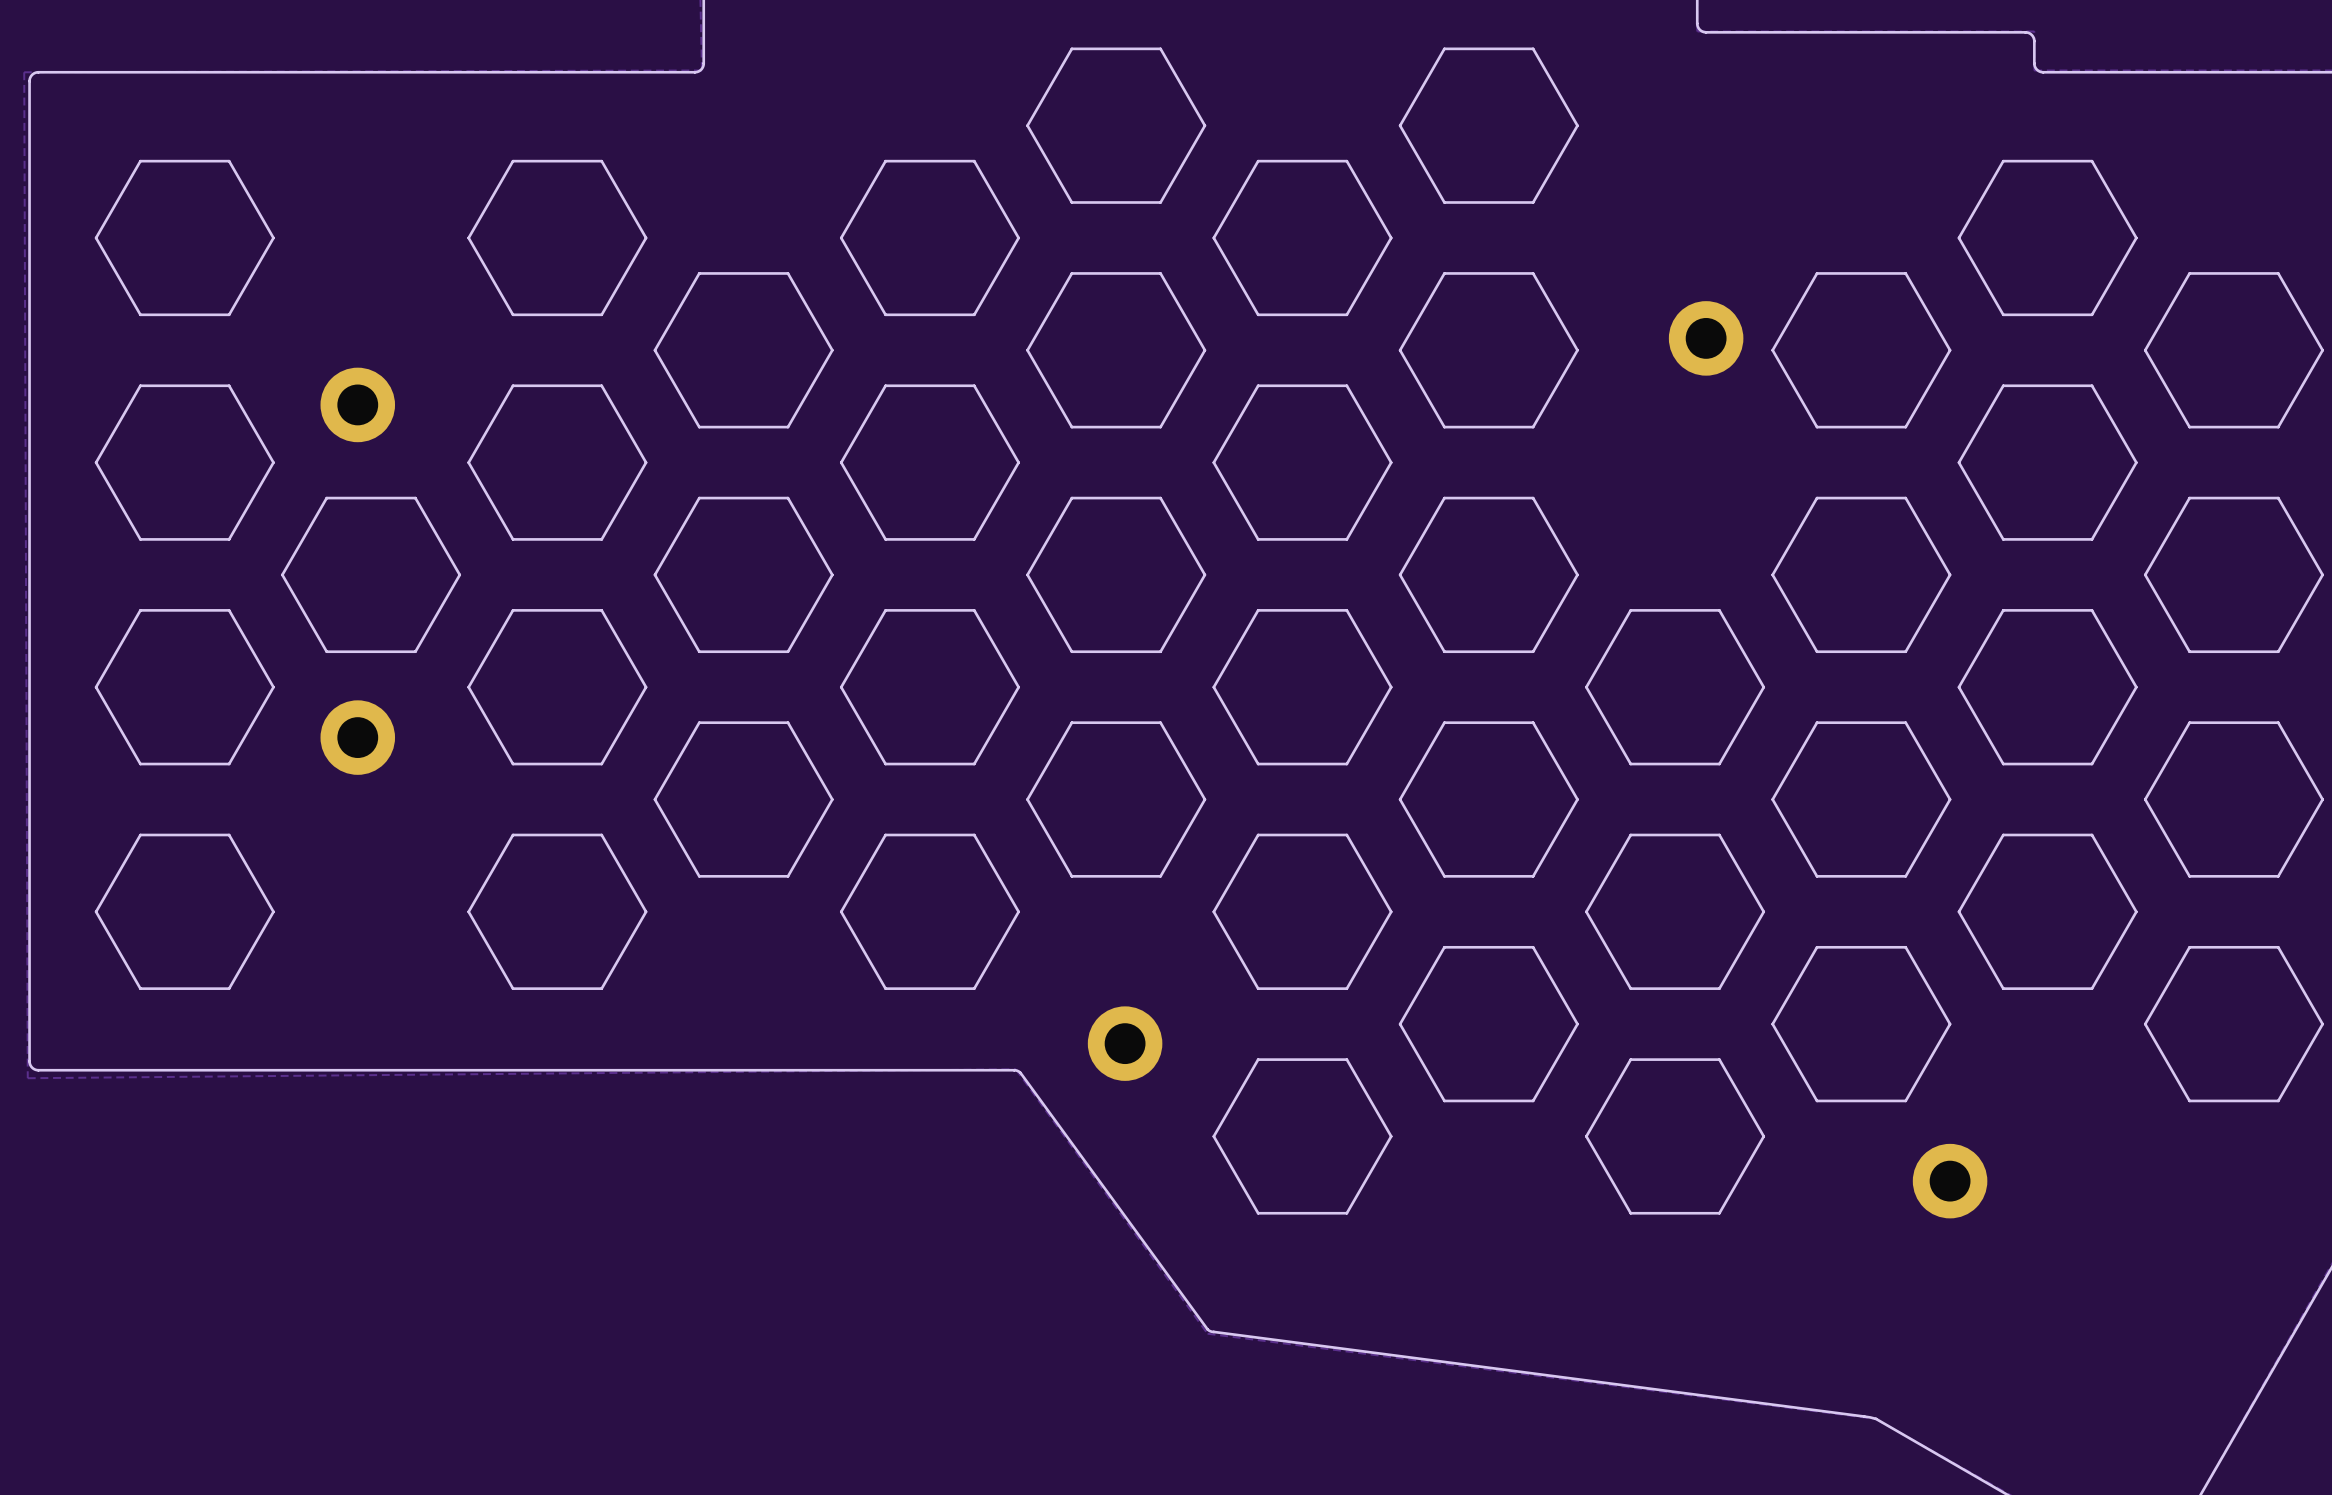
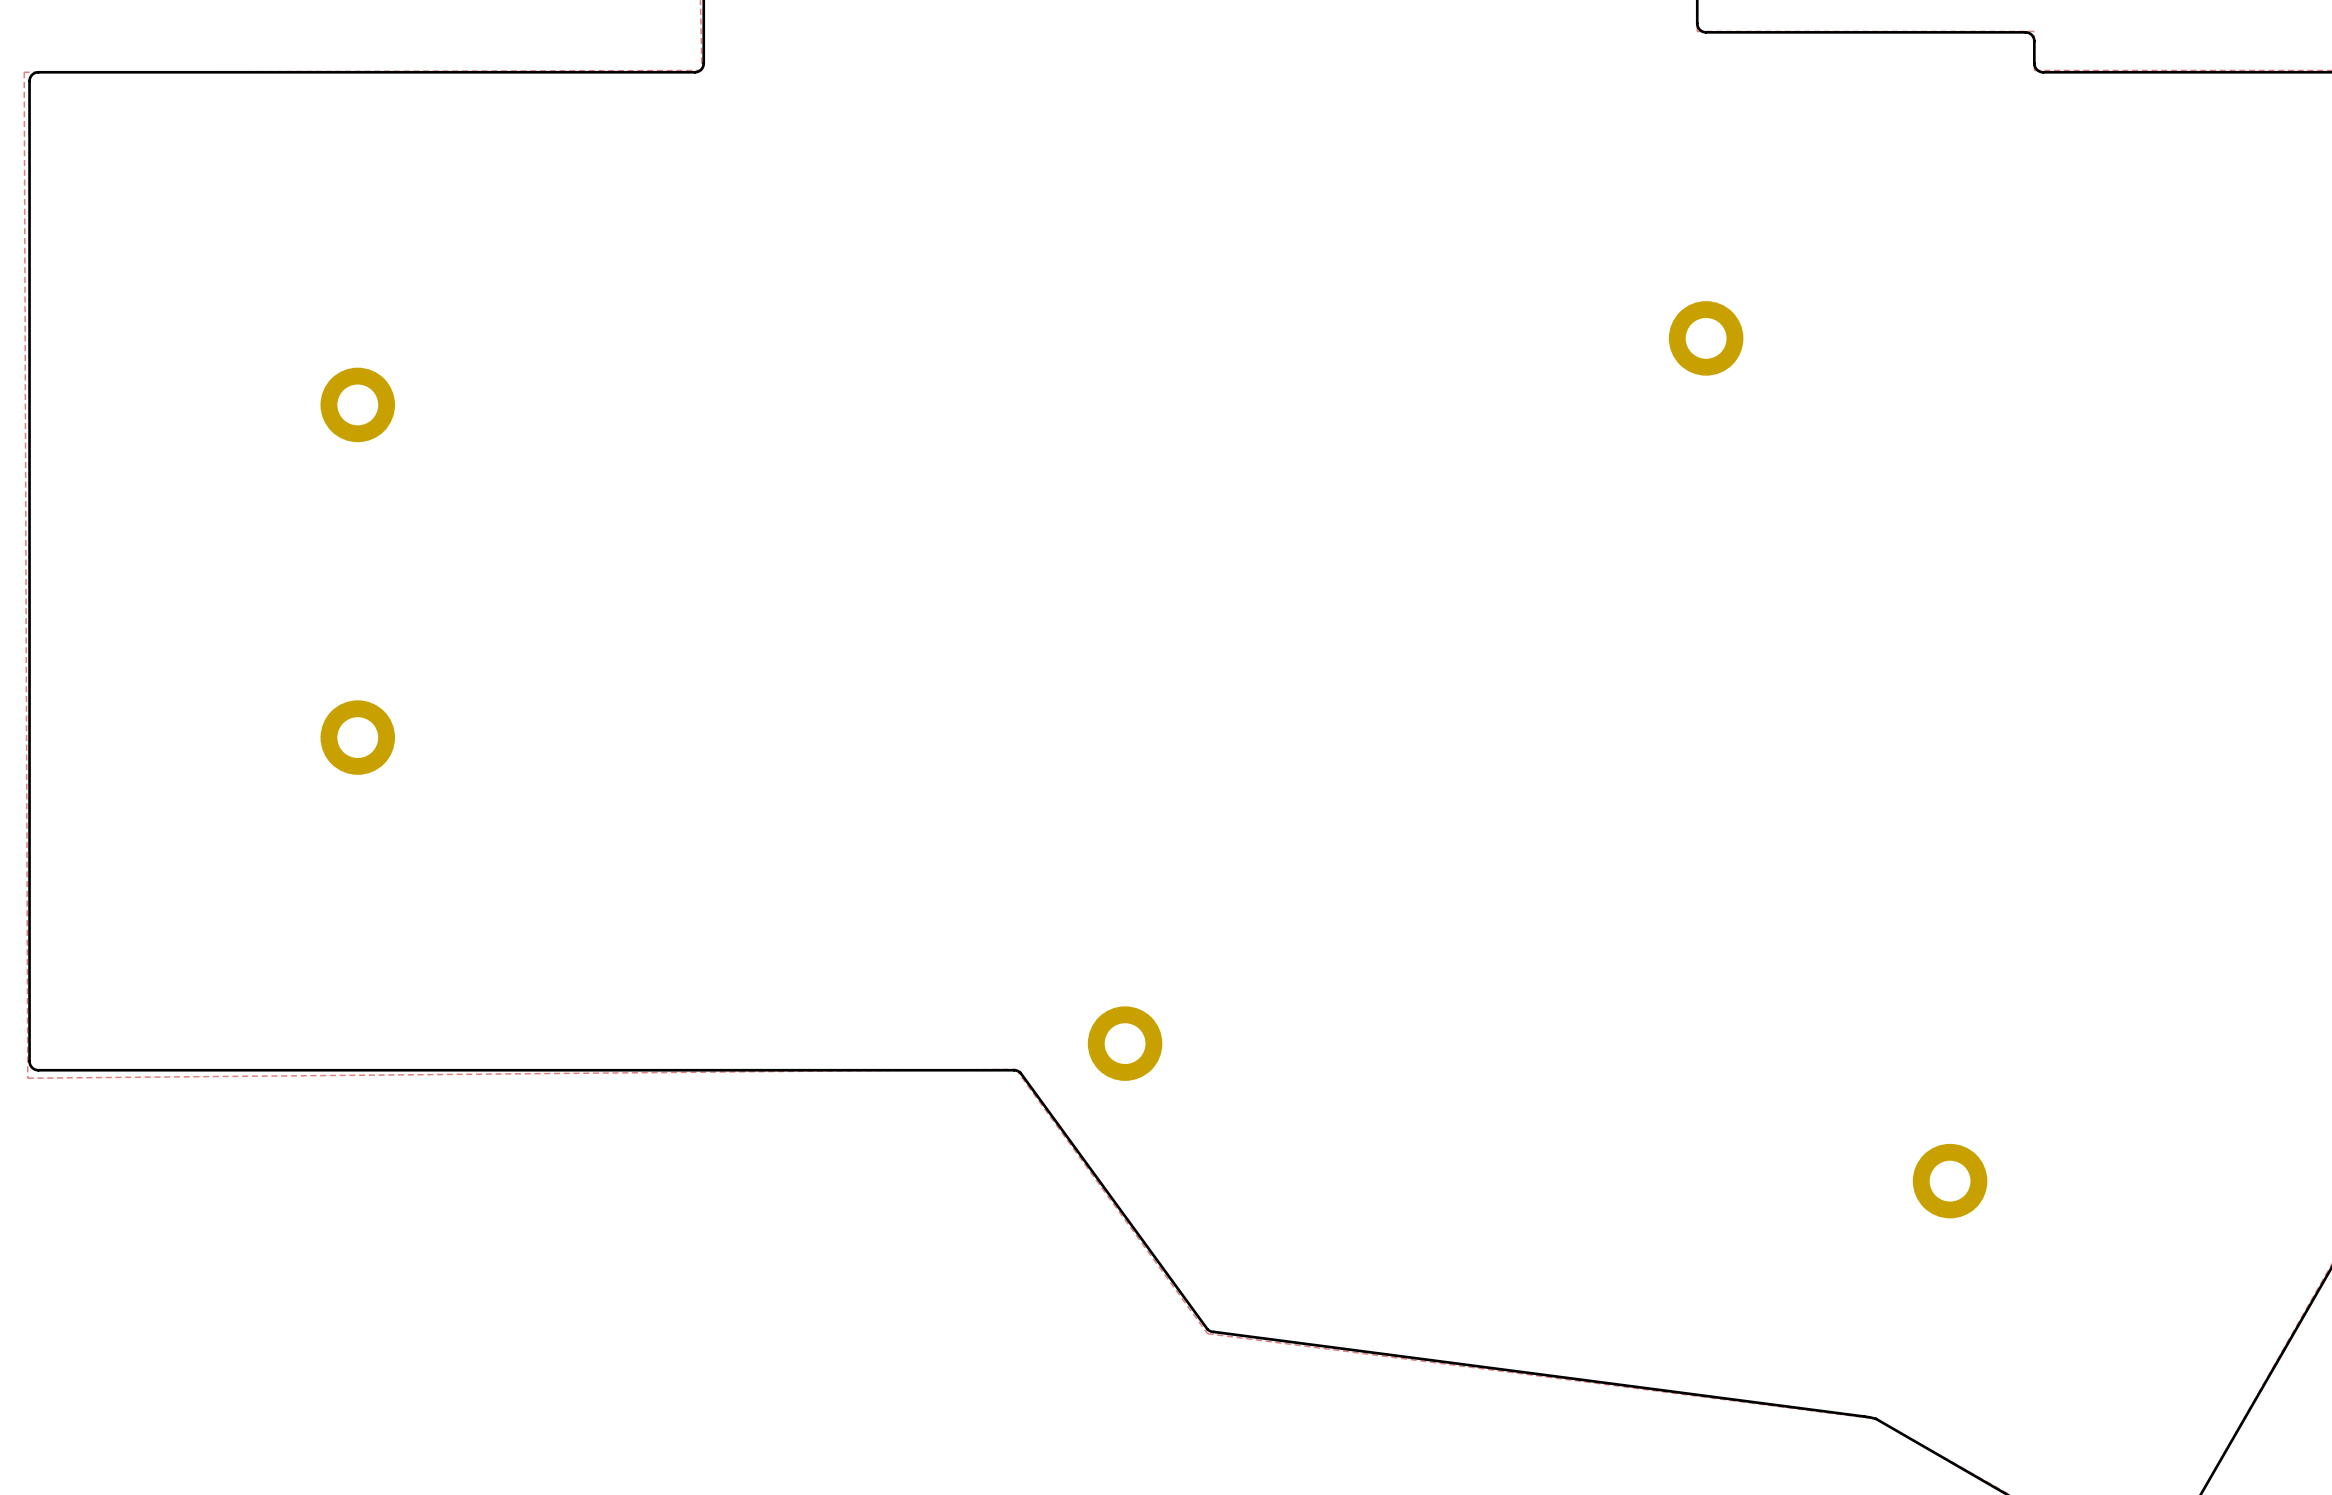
board edge: (1071, 48) (1027, 125) (1071, 202) (1160, 202) (1204, 125) (1160, 48) (1071, 48) -> none
board edge: (1444, 48) (1533, 48) (1577, 125) (1533, 202) (1444, 202) (1400, 125) (1444, 48) -> none
board edge: (140, 161) (229, 161) (273, 237) (229, 314) (140, 314) (96, 237) (140, 161) -> none
board edge: (513, 161) (601, 161) (646, 237) (601, 314) (513, 314) (468, 237) (513, 161) -> none
board edge: (885, 161) (841, 237) (885, 314) (974, 314) (1018, 237) (974, 161) (885, 161) -> none
board edge: (1258, 161) (1346, 161) (1391, 237) (1346, 314) (1258, 314) (1213, 237) (1258, 161) -> none
board edge: (2003, 161) (2092, 161) (2136, 237) (2092, 314) (2003, 314) (1958, 237) (2003, 161) -> none
board edge: (699, 273) (788, 273) (832, 350) (788, 427) (699, 427) (654, 350) (699, 273) -> none
board edge: (1071, 273) (1027, 350) (1071, 427) (1160, 427) (1204, 350) (1160, 273) (1071, 273) -> none
board edge: (1444, 273) (1533, 273) (1577, 350) (1533, 427) (1444, 427) (1400, 350) (1444, 273) -> none
board edge: (1817, 273) (1905, 273) (1950, 350) (1905, 427) (1817, 427) (1772, 350) (1817, 273) -> none
board edge: (2189, 273) (2278, 273) (2322, 350) (2278, 427) (2189, 427) (2145, 350) (2189, 273) -> none
board edge: (140, 385) (229, 385) (273, 462) (229, 539) (140, 539) (96, 462) (140, 385) -> none
board edge: (513, 385) (601, 385) (646, 462) (601, 539) (513, 539) (468, 462) (513, 385) -> none
board edge: (885, 385) (974, 385) (1018, 462) (974, 539) (885, 539) (841, 462) (885, 385) -> none
board edge: (1258, 385) (1346, 385) (1391, 462) (1346, 539) (1258, 539) (1213, 462) (1258, 385) -> none
board edge: (2003, 385) (2092, 385) (2136, 462) (2092, 539) (2003, 539) (1958, 462) (2003, 385) -> none
board edge: (326, 498) (415, 498) (459, 574) (415, 651) (326, 651) (282, 574) (326, 498) -> none
board edge: (699, 498) (788, 498) (832, 574) (788, 651) (699, 651) (654, 574) (699, 498) -> none
board edge: (1071, 498) (1160, 498) (1204, 574) (1160, 651) (1071, 651) (1027, 574) (1071, 498) -> none
board edge: (1444, 498) (1533, 498) (1577, 574) (1533, 651) (1444, 651) (1400, 574) (1444, 498) -> none
board edge: (1817, 498) (1905, 498) (1950, 574) (1905, 651) (1817, 651) (1772, 574) (1817, 498) -> none
board edge: (2189, 498) (2145, 574) (2189, 651) (2278, 651) (2322, 574) (2278, 498) (2189, 498) -> none
board edge: (140, 610) (229, 610) (273, 687) (229, 764) (140, 764) (96, 687) (140, 610) -> none
board edge: (513, 610) (601, 610) (646, 687) (601, 764) (513, 764) (468, 687) (513, 610) -> none
board edge: (885, 610) (974, 610) (1018, 687) (974, 764) (885, 764) (841, 687) (885, 610) -> none
board edge: (1258, 610) (1346, 610) (1391, 687) (1346, 764) (1258, 764) (1213, 687) (1258, 610) -> none
board edge: (1630, 610) (1586, 687) (1630, 764) (1719, 764) (1763, 687) (1719, 610) (1630, 610) -> none
board edge: (2003, 610) (2092, 610) (2136, 687) (2092, 764) (2003, 764) (1958, 687) (2003, 610) -> none
board edge: (699, 722) (788, 722) (832, 799) (788, 876) (699, 876) (654, 799) (699, 722) -> none
board edge: (1071, 722) (1160, 722) (1204, 799) (1160, 876) (1071, 876) (1027, 799) (1071, 722) -> none
board edge: (1444, 722) (1533, 722) (1577, 799) (1533, 876) (1444, 876) (1400, 799) (1444, 722) -> none
board edge: (1817, 722) (1905, 722) (1950, 799) (1905, 876) (1817, 876) (1772, 799) (1817, 722) -> none
board edge: (2189, 722) (2278, 722) (2322, 799) (2278, 876) (2189, 876) (2145, 799) (2189, 722) -> none
board edge: (140, 834) (229, 834) (273, 911) (229, 988) (140, 988) (96, 911) (140, 834) -> none
board edge: (513, 834) (601, 834) (646, 911) (601, 988) (513, 988) (468, 911) (513, 834) -> none
board edge: (885, 834) (974, 834) (1018, 911) (974, 988) (885, 988) (841, 911) (885, 834) -> none
board edge: (1258, 834) (1346, 834) (1391, 911) (1346, 988) (1258, 988) (1213, 911) (1258, 834) -> none
board edge: (1630, 834) (1719, 834) (1763, 911) (1719, 988) (1630, 988) (1586, 911) (1630, 834) -> none
board edge: (2003, 834) (2092, 834) (2136, 911) (2092, 988) (2003, 988) (1958, 911) (2003, 834) -> none
board edge: (1444, 947) (1533, 947) (1577, 1024) (1533, 1100) (1444, 1100) (1400, 1024) (1444, 947) -> none
board edge: (1817, 947) (1905, 947) (1950, 1024) (1905, 1100) (1817, 1100) (1772, 1024) (1817, 947) -> none
board edge: (2189, 947) (2145, 1024) (2189, 1100) (2278, 1100) (2322, 1024) (2278, 947) (2189, 947) -> none
board edge: (1258, 1059) (1346, 1059) (1391, 1136) (1346, 1213) (1258, 1213) (1213, 1136) (1258, 1059) -> none
board edge: (1630, 1059) (1719, 1059) (1763, 1136) (1719, 1213) (1630, 1213) (1586, 1136) (1630, 1059) -> none

